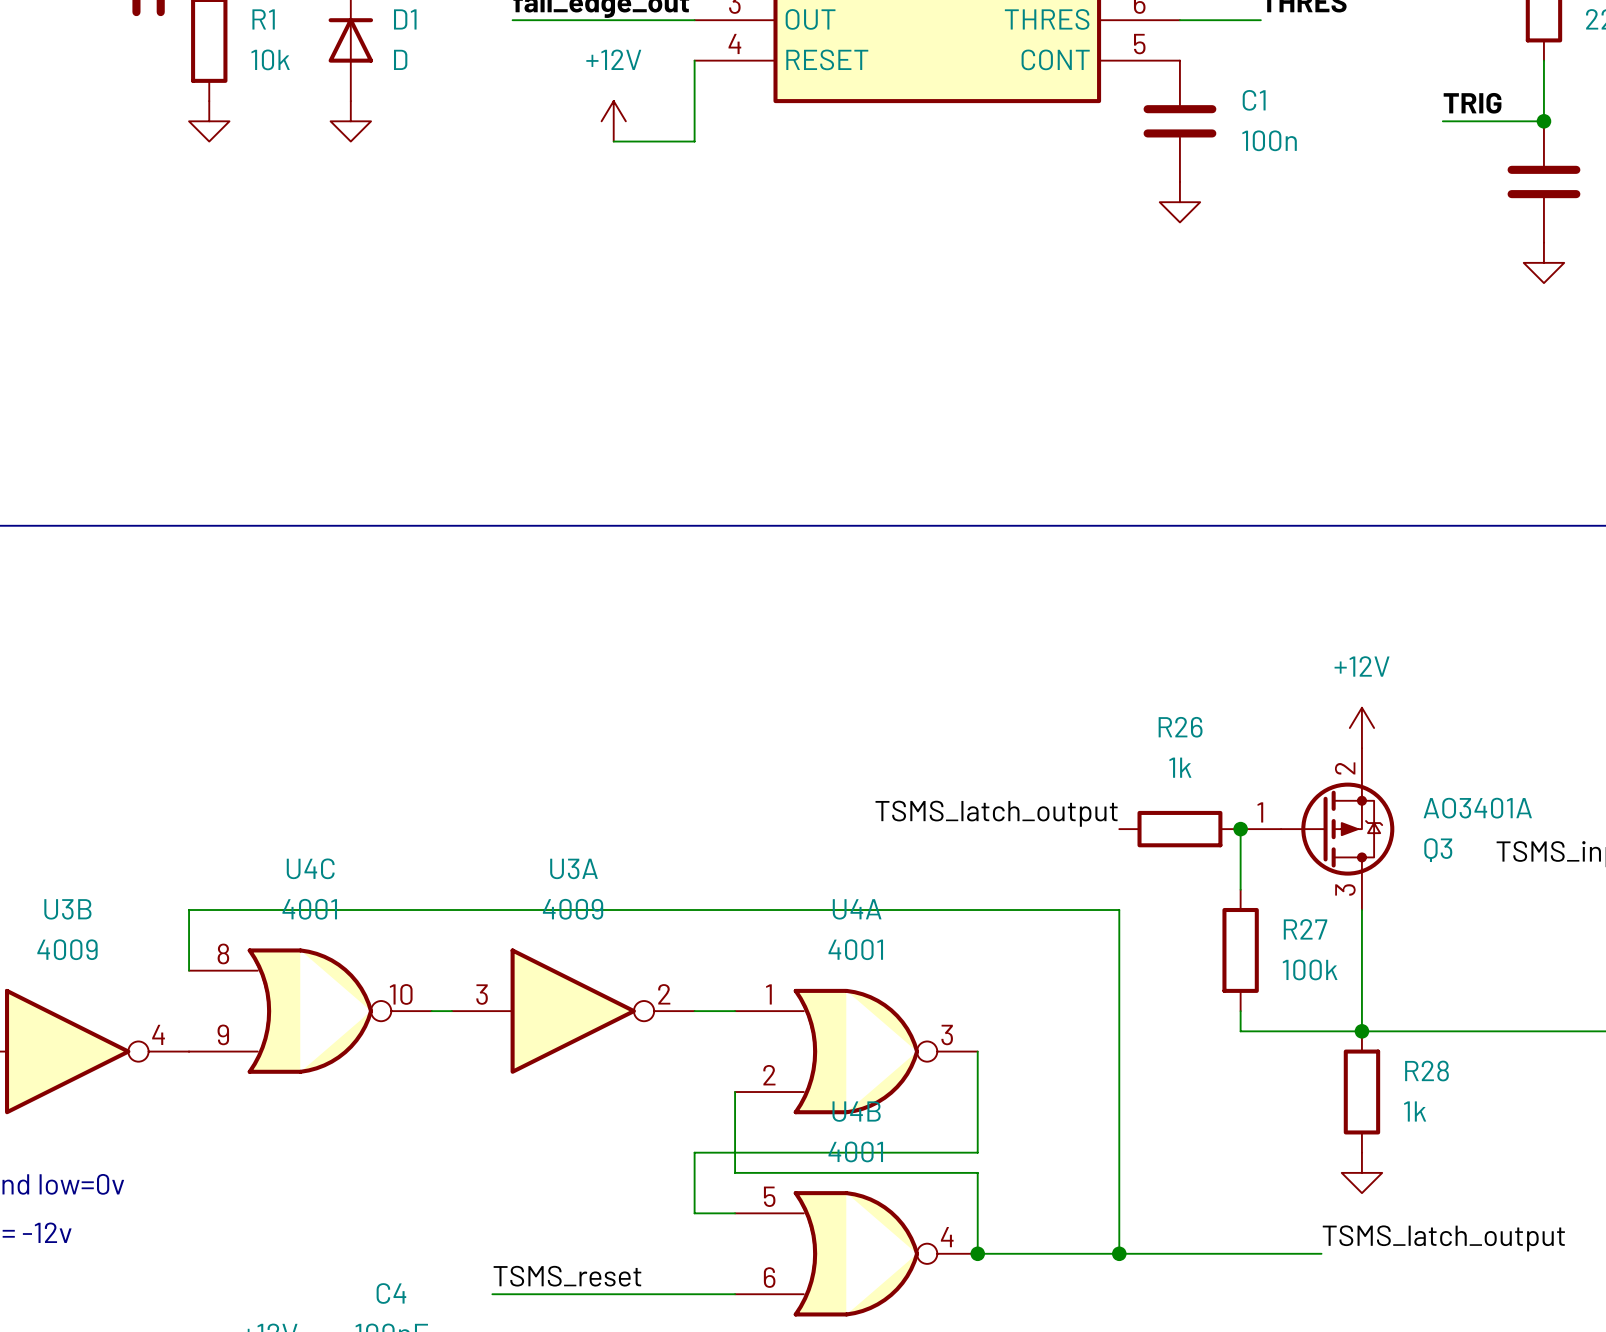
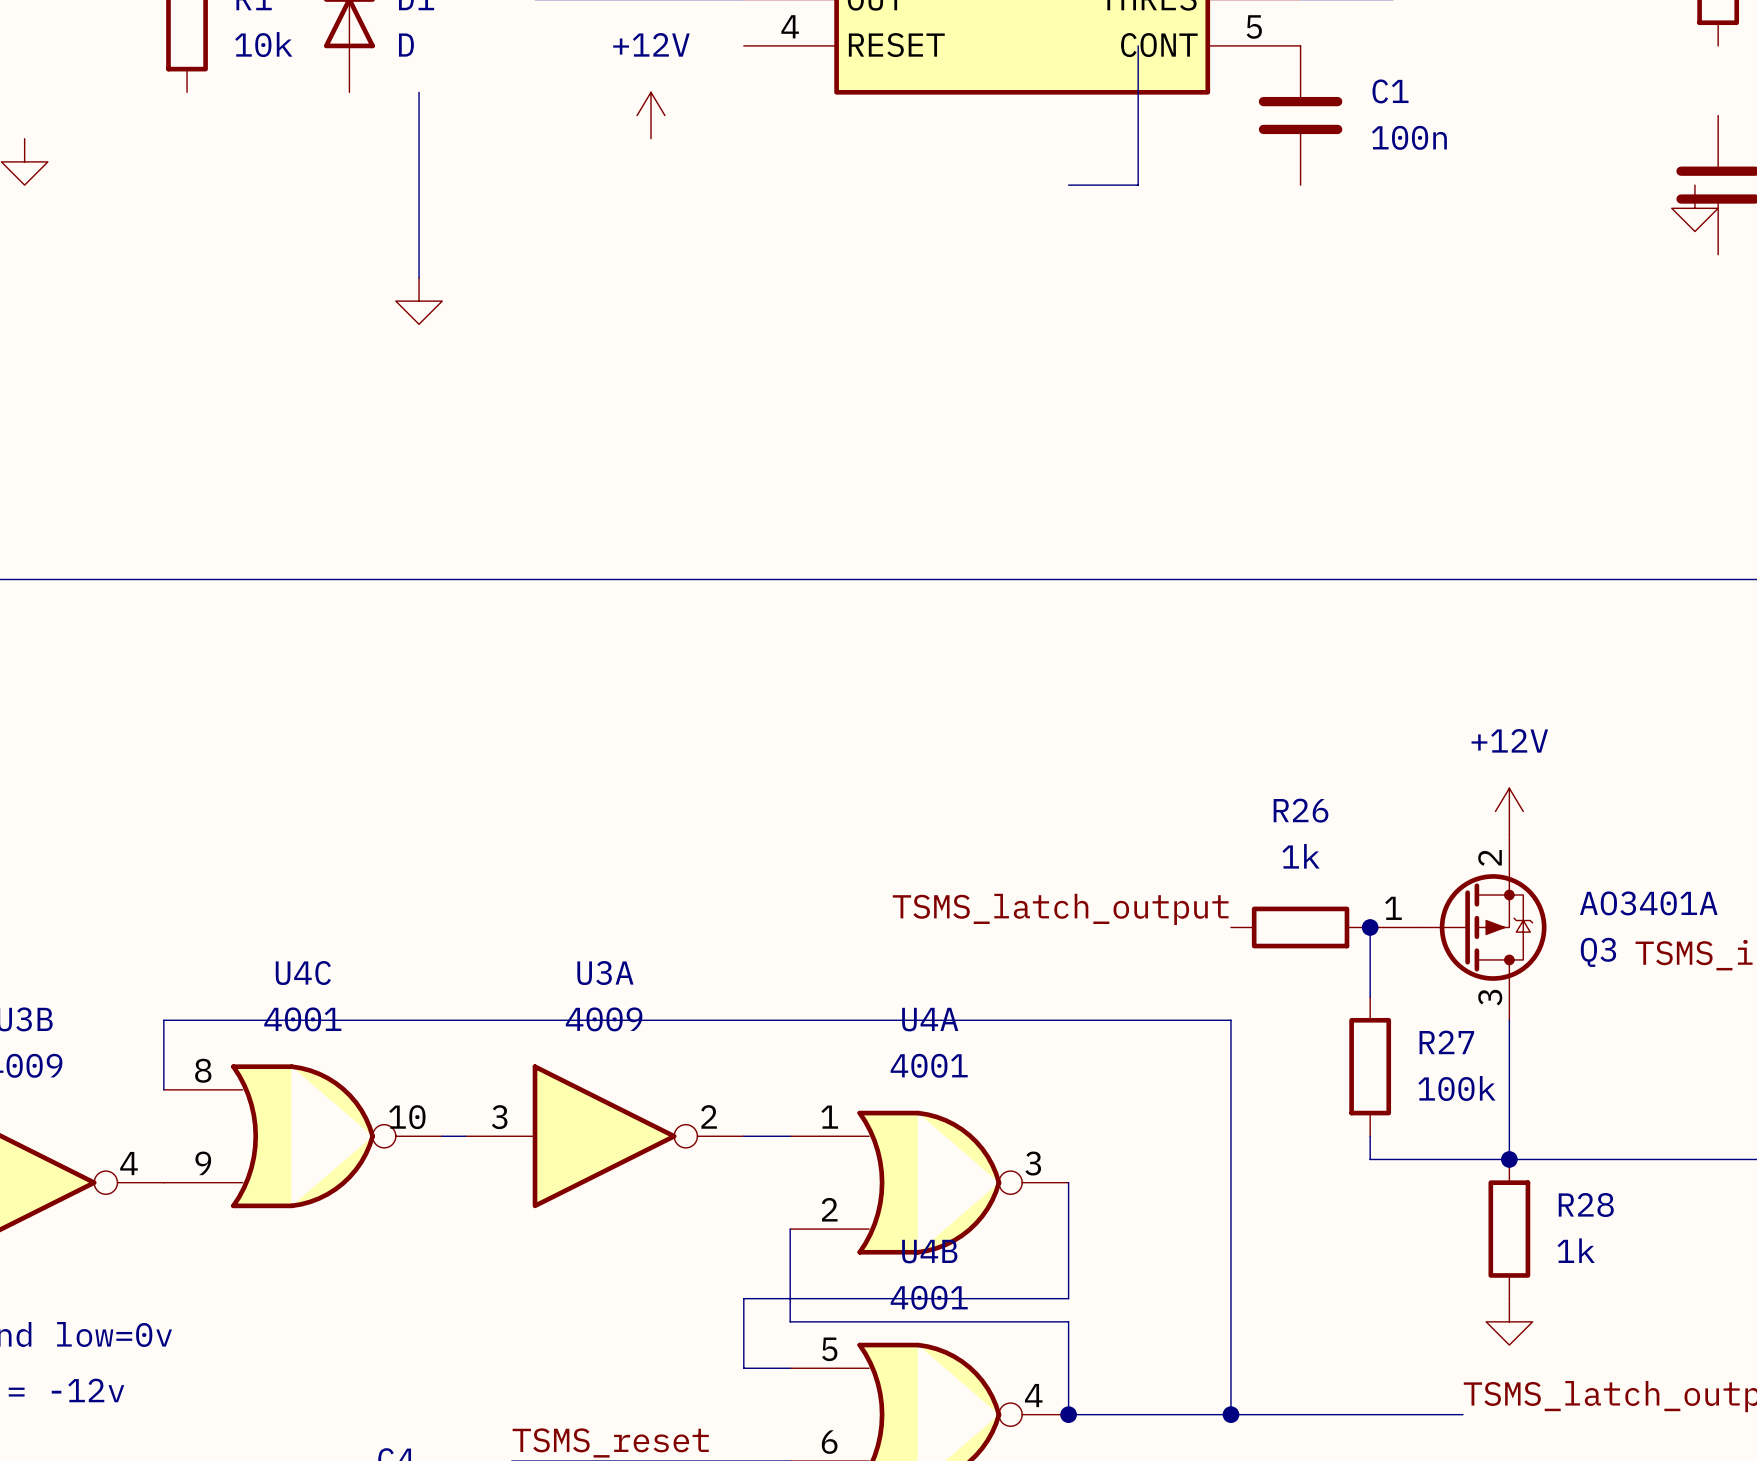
wire: (694, 60) (694, 141) (613, 141) -> none
wire: none -> (1138, 45) (1138, 185) (1068, 185)
wire: (1543, 60) (1543, 121) (1442, 121) -> none
wire: none -> (419, 92) (419, 277)
label: TRIG (1472, 103) -> none
power symbol: (209, 121) -> none
power symbol: (350, 121) -> none
junction: (1543, 121) -> none
power symbol: none -> (24, 161)
power symbol: (1179, 202) -> none
power symbol position: (1543, 262) -> (1694, 208)
power symbol: none -> (419, 301)

